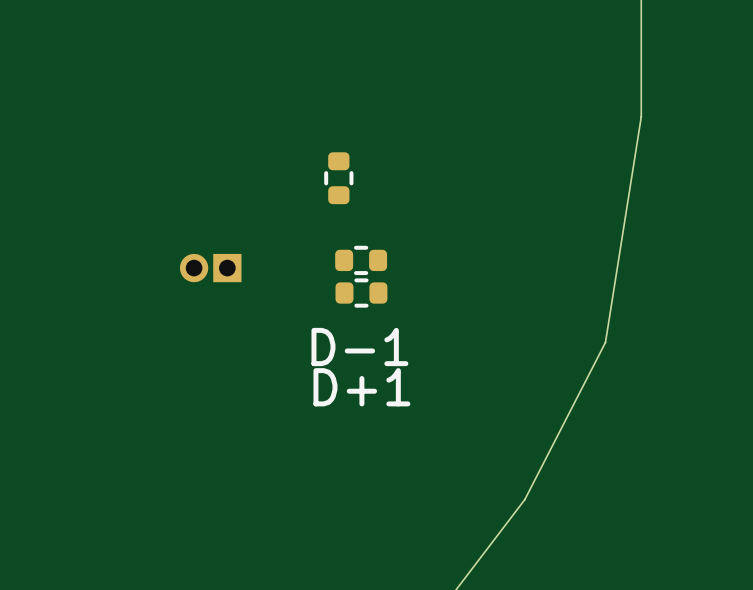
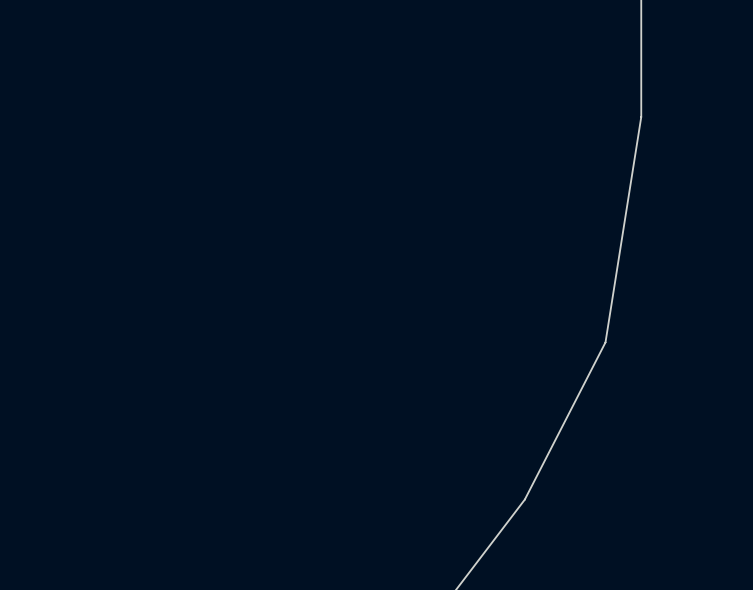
part: (338, 178) -> none
D+1: (361, 260) -> none
part: (210, 268) -> none
D-1: (361, 293) -> none

